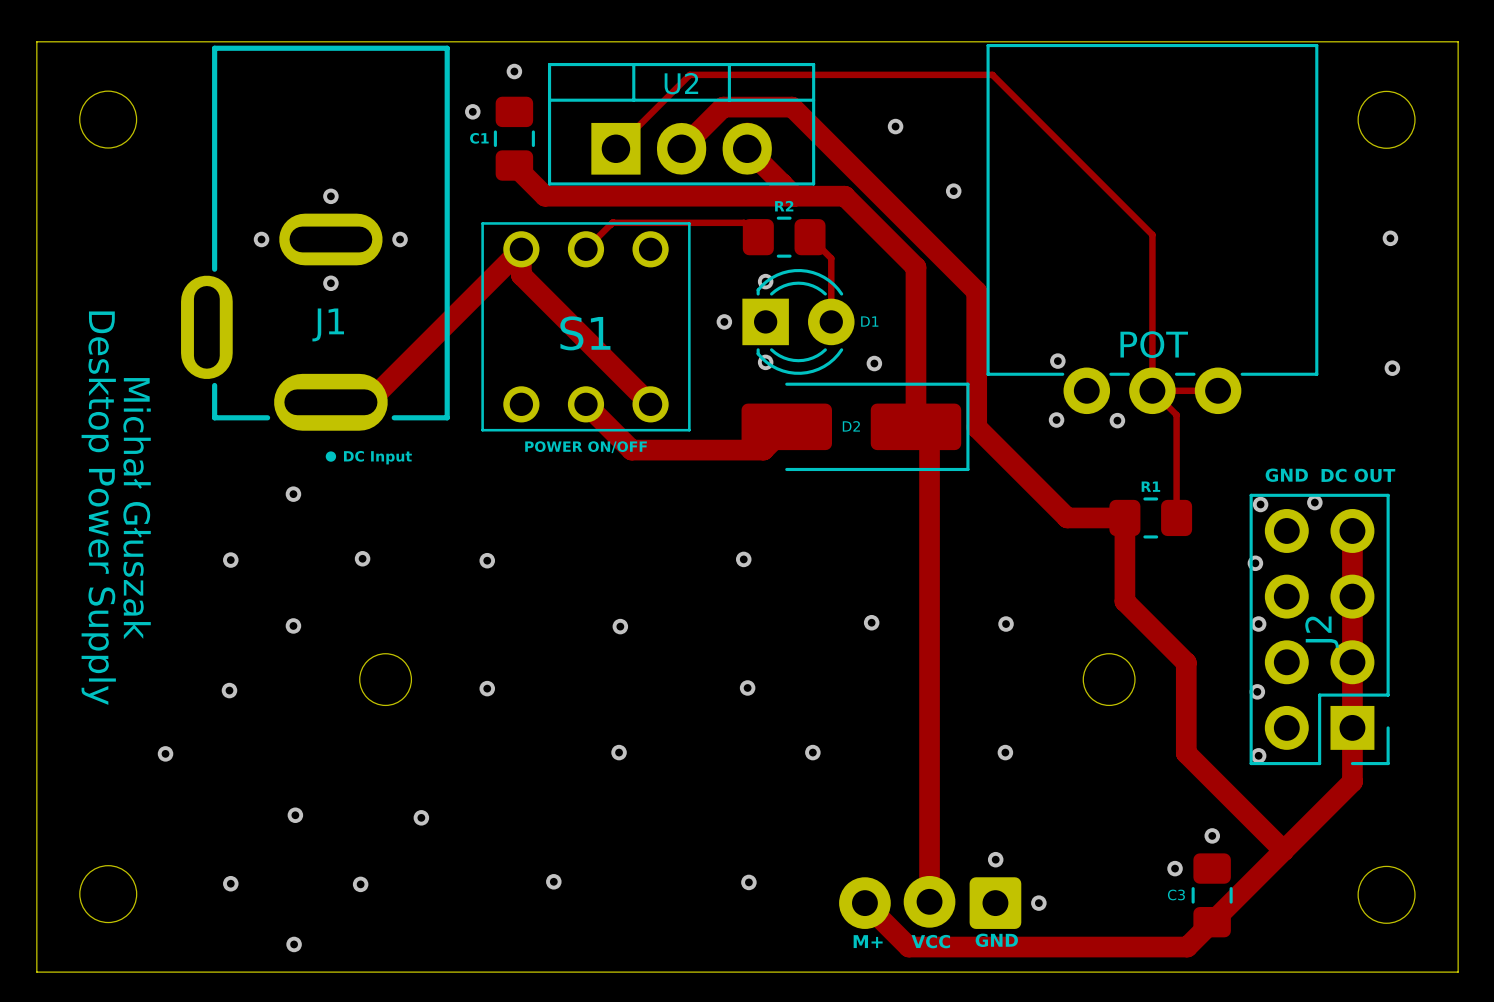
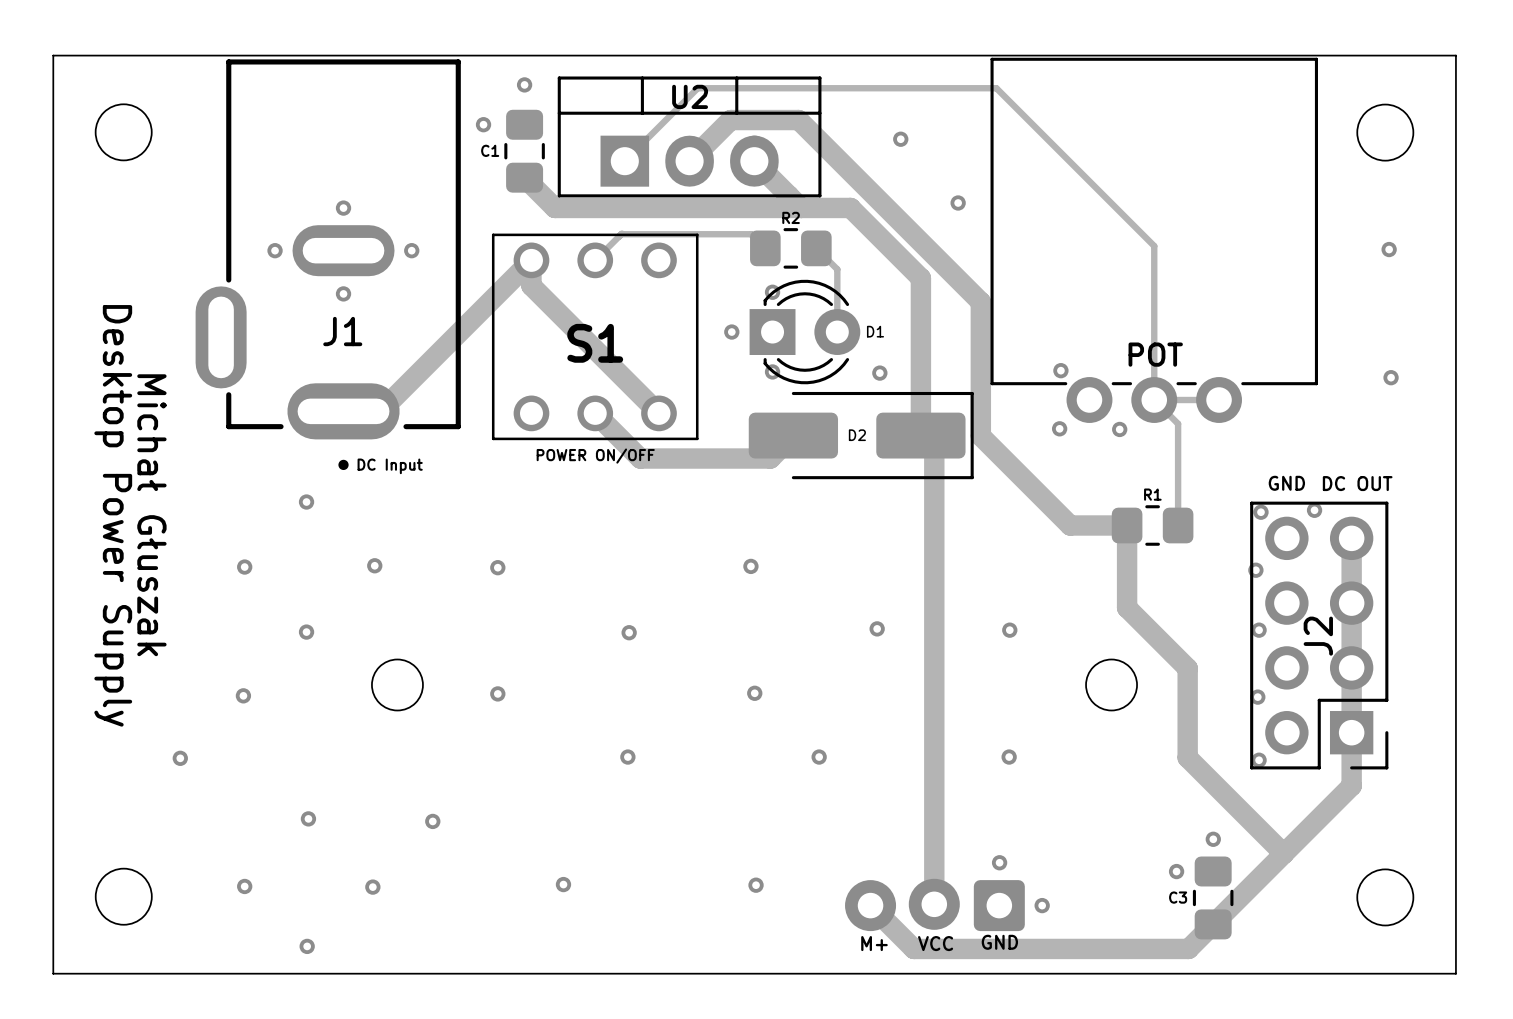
part footprint: [986, 43, 1319, 415] -> [990, 57, 1318, 423]

